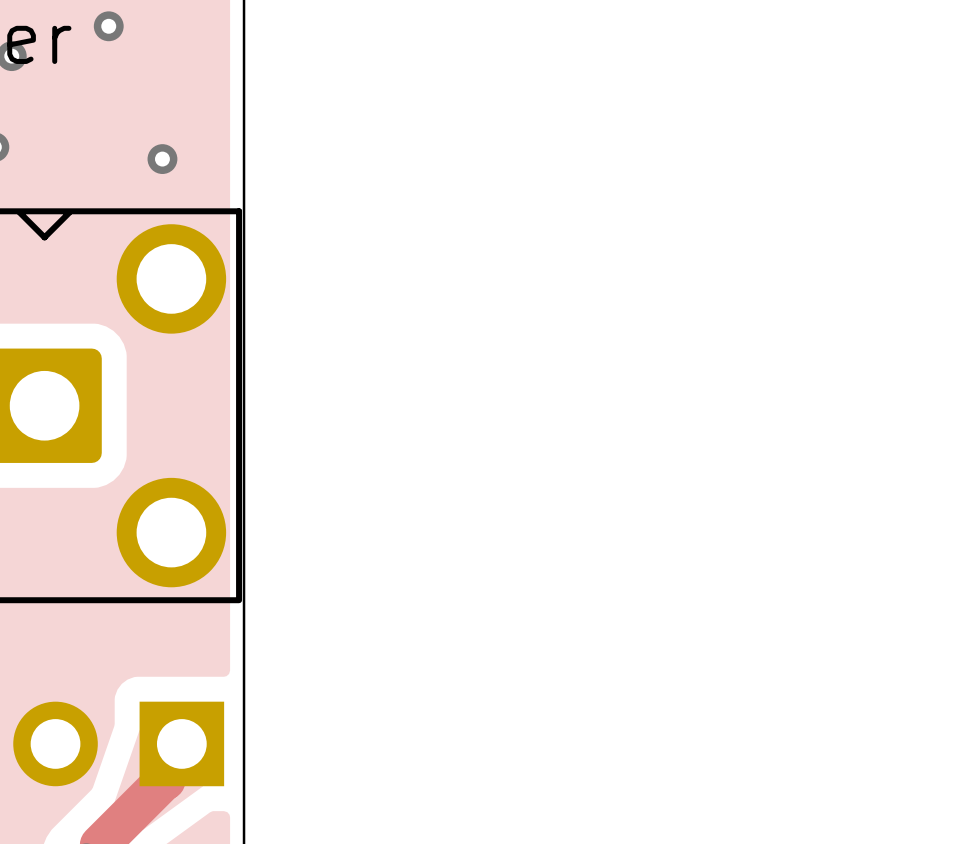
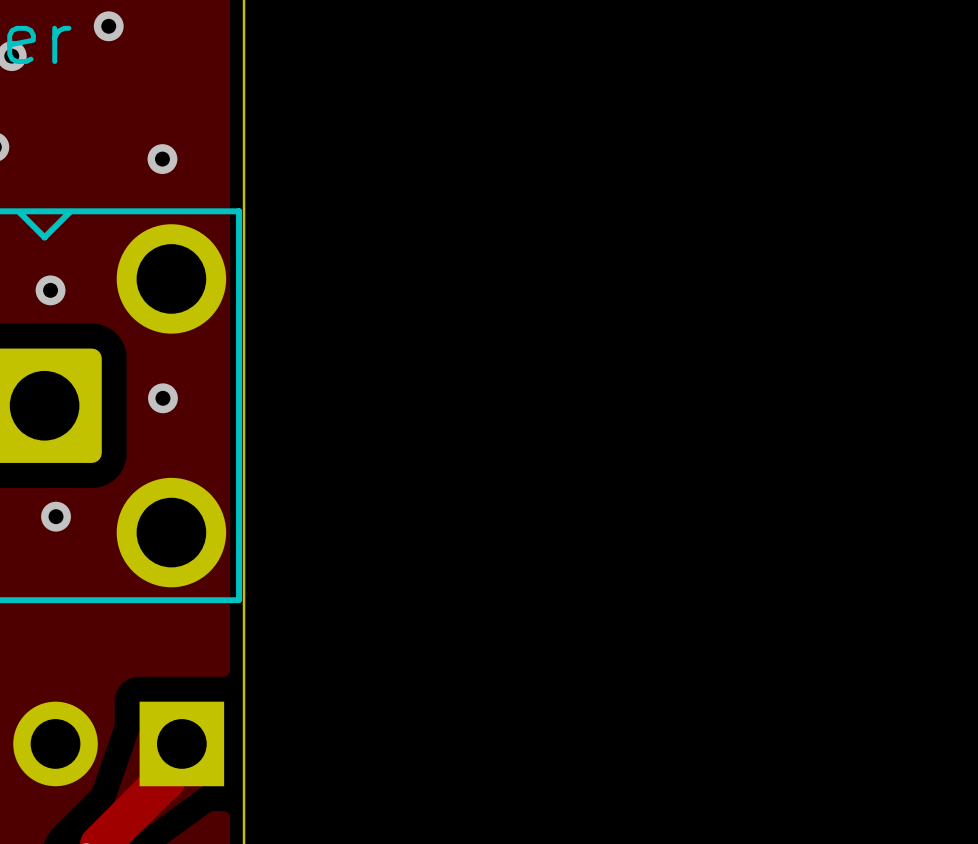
via: none -> (50, 290)
via: none -> (162, 398)
via: none -> (56, 516)

